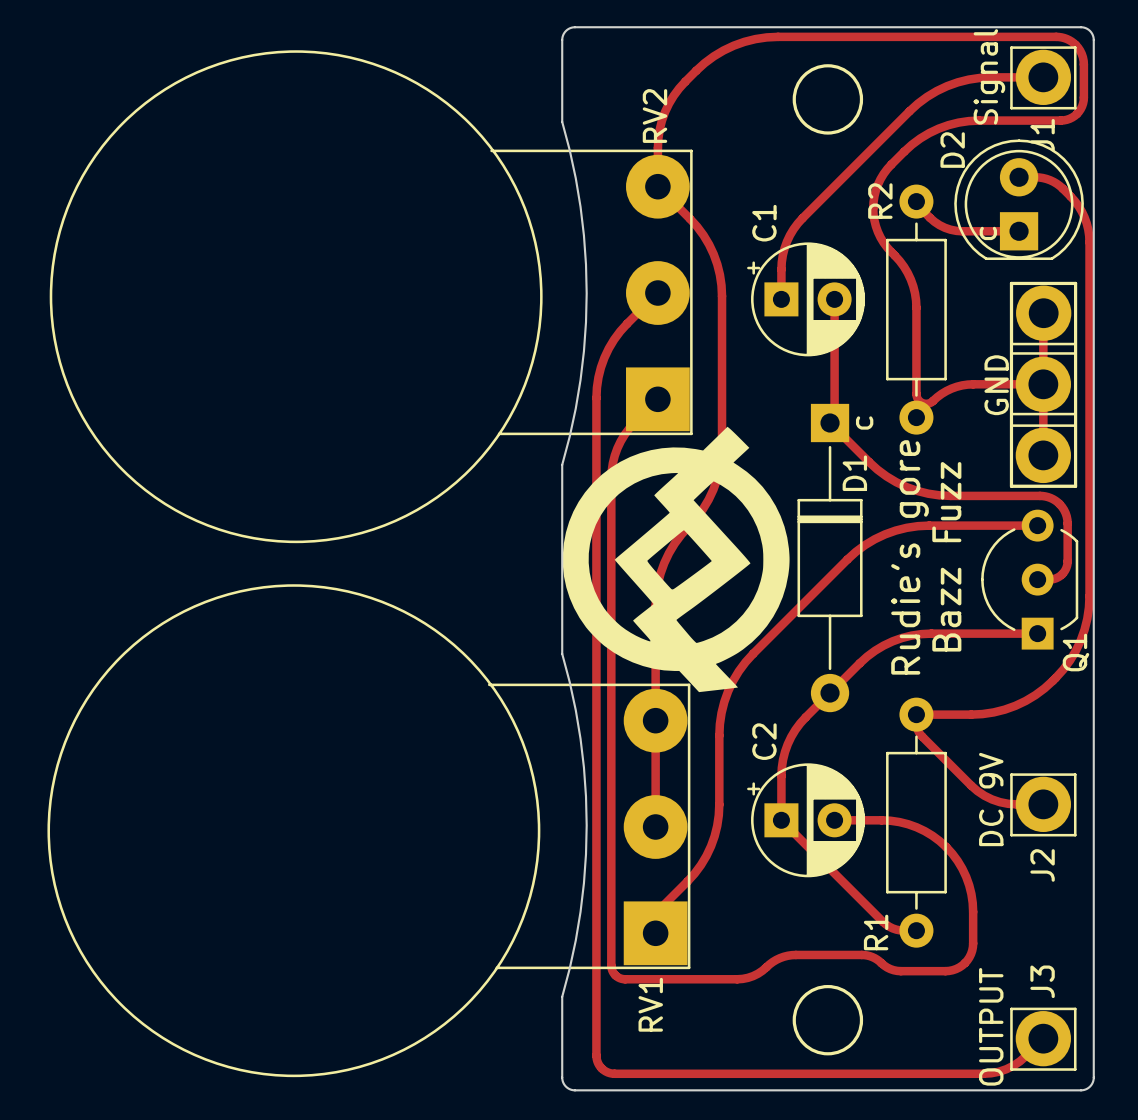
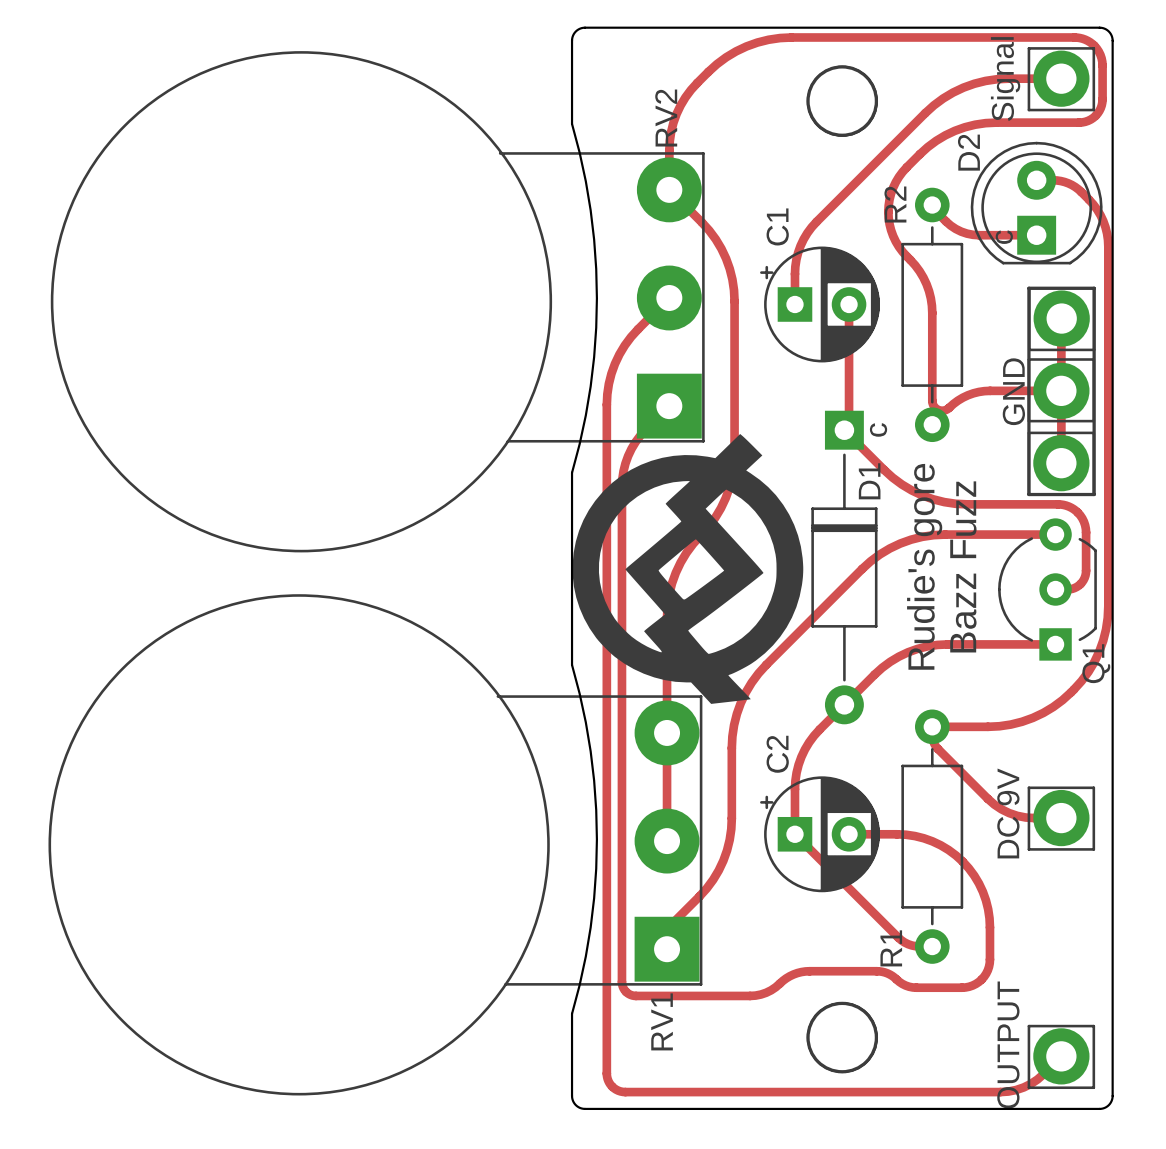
J1 name: J1 (1042, 135) -> none
J2 name: J2 (1042, 865) -> none
J3 name: J3 (1042, 981) -> none

